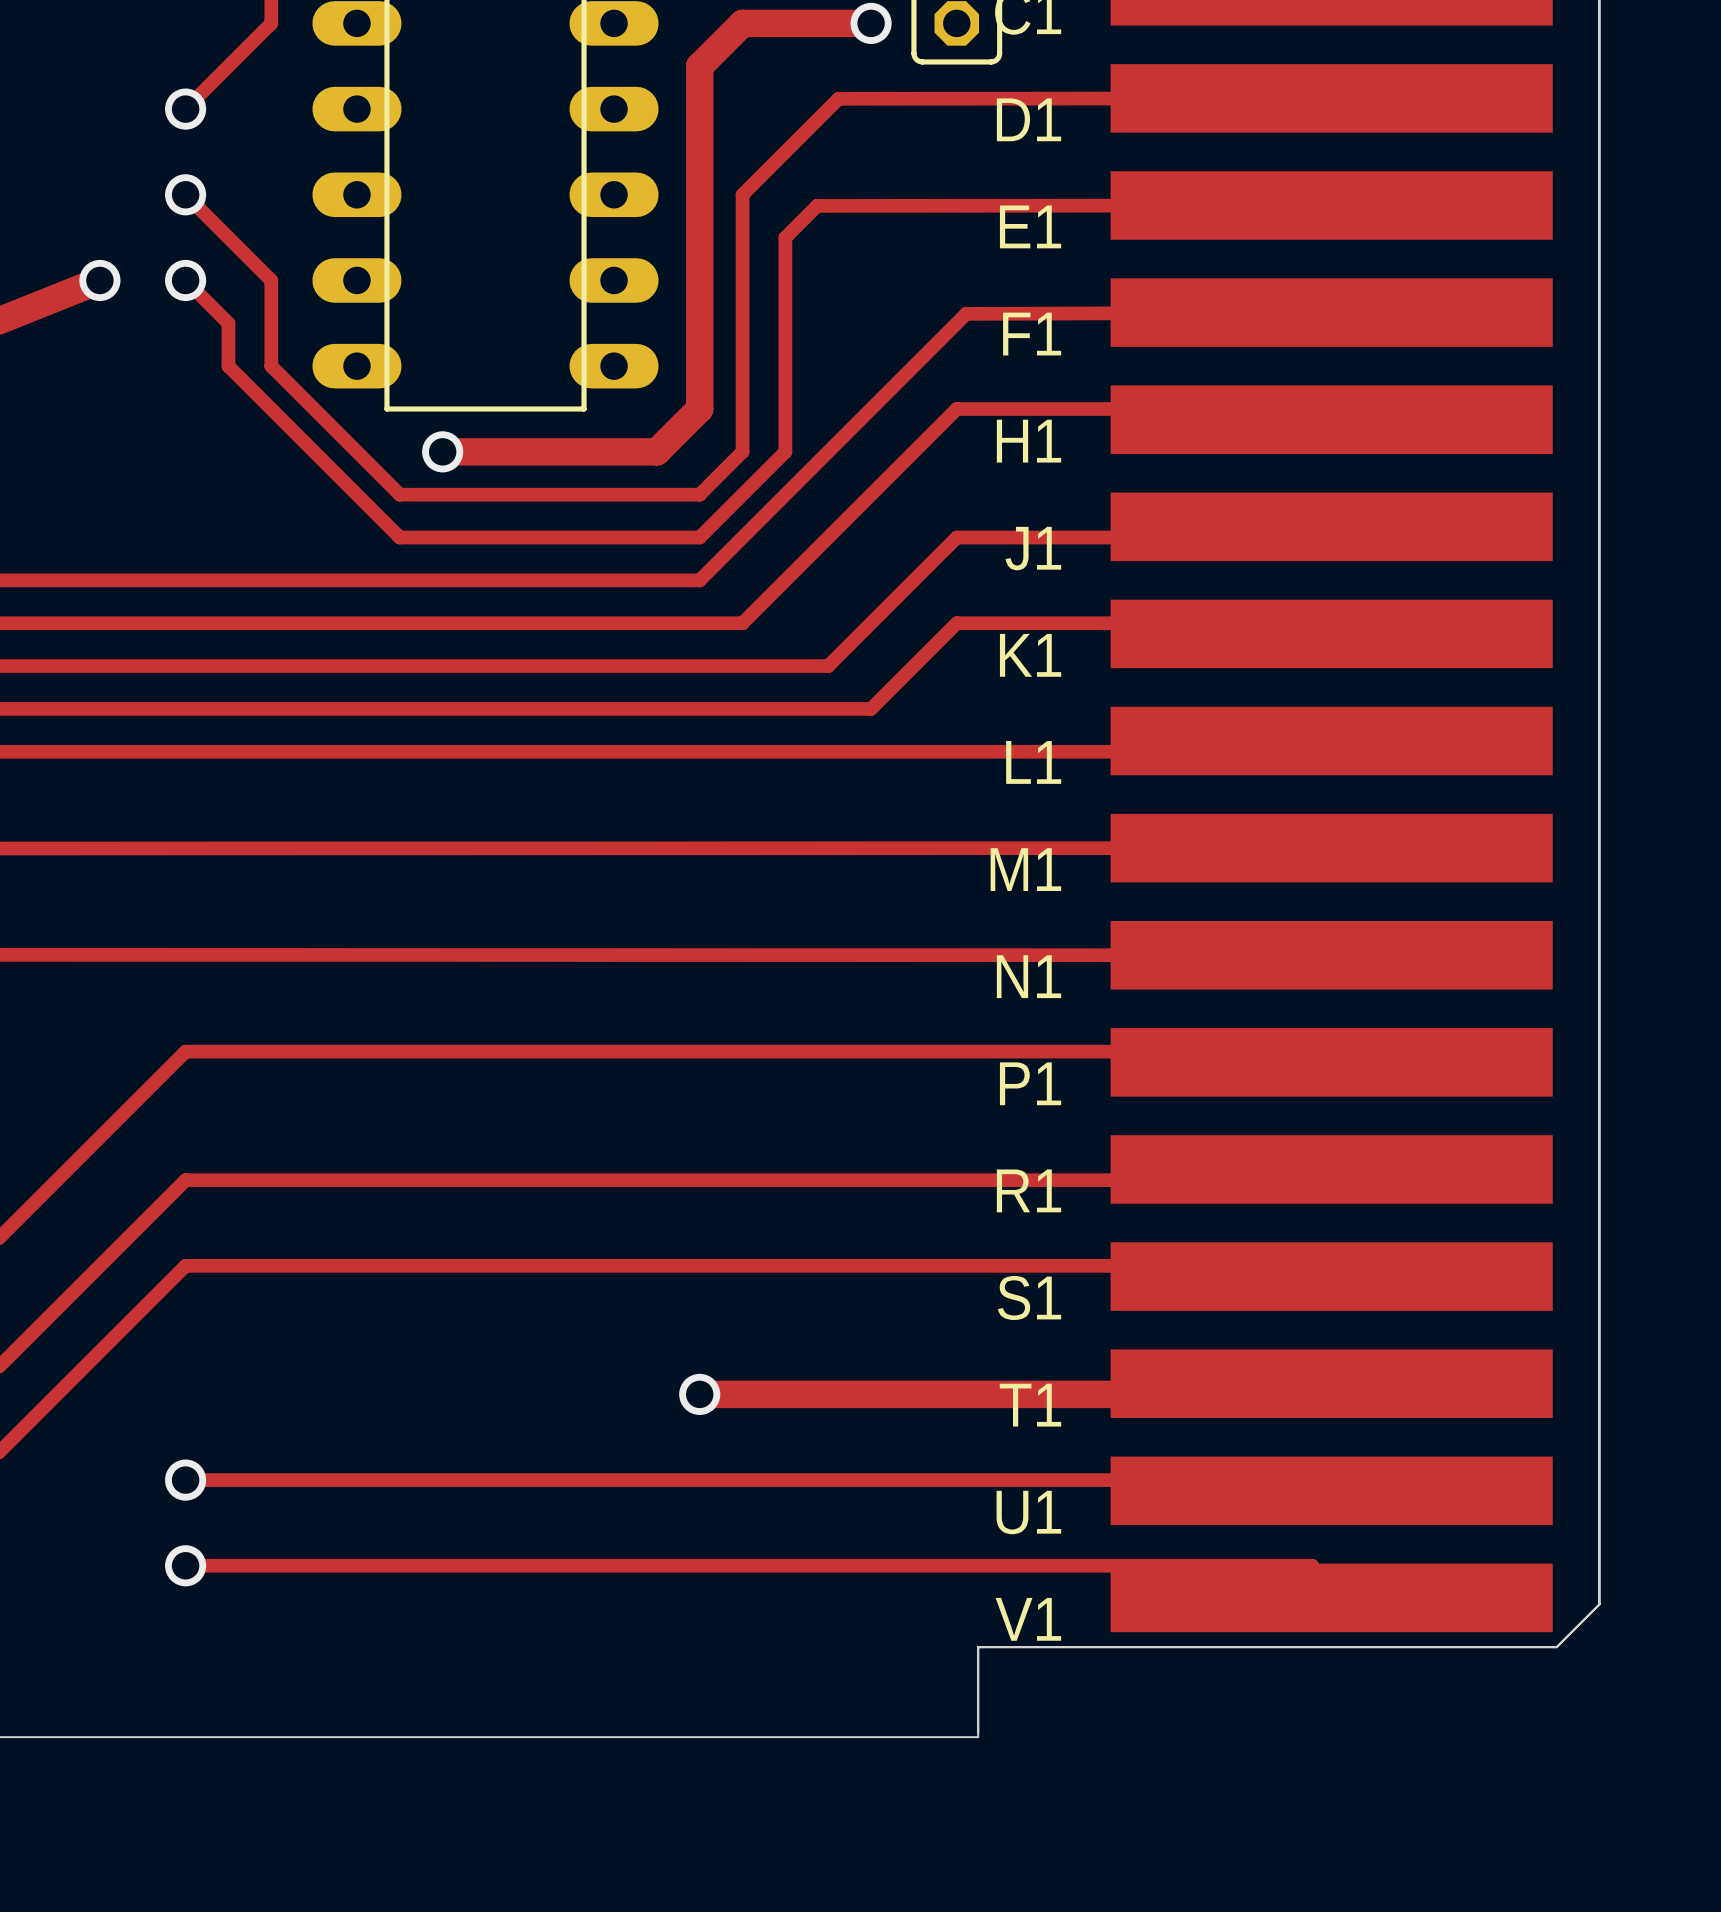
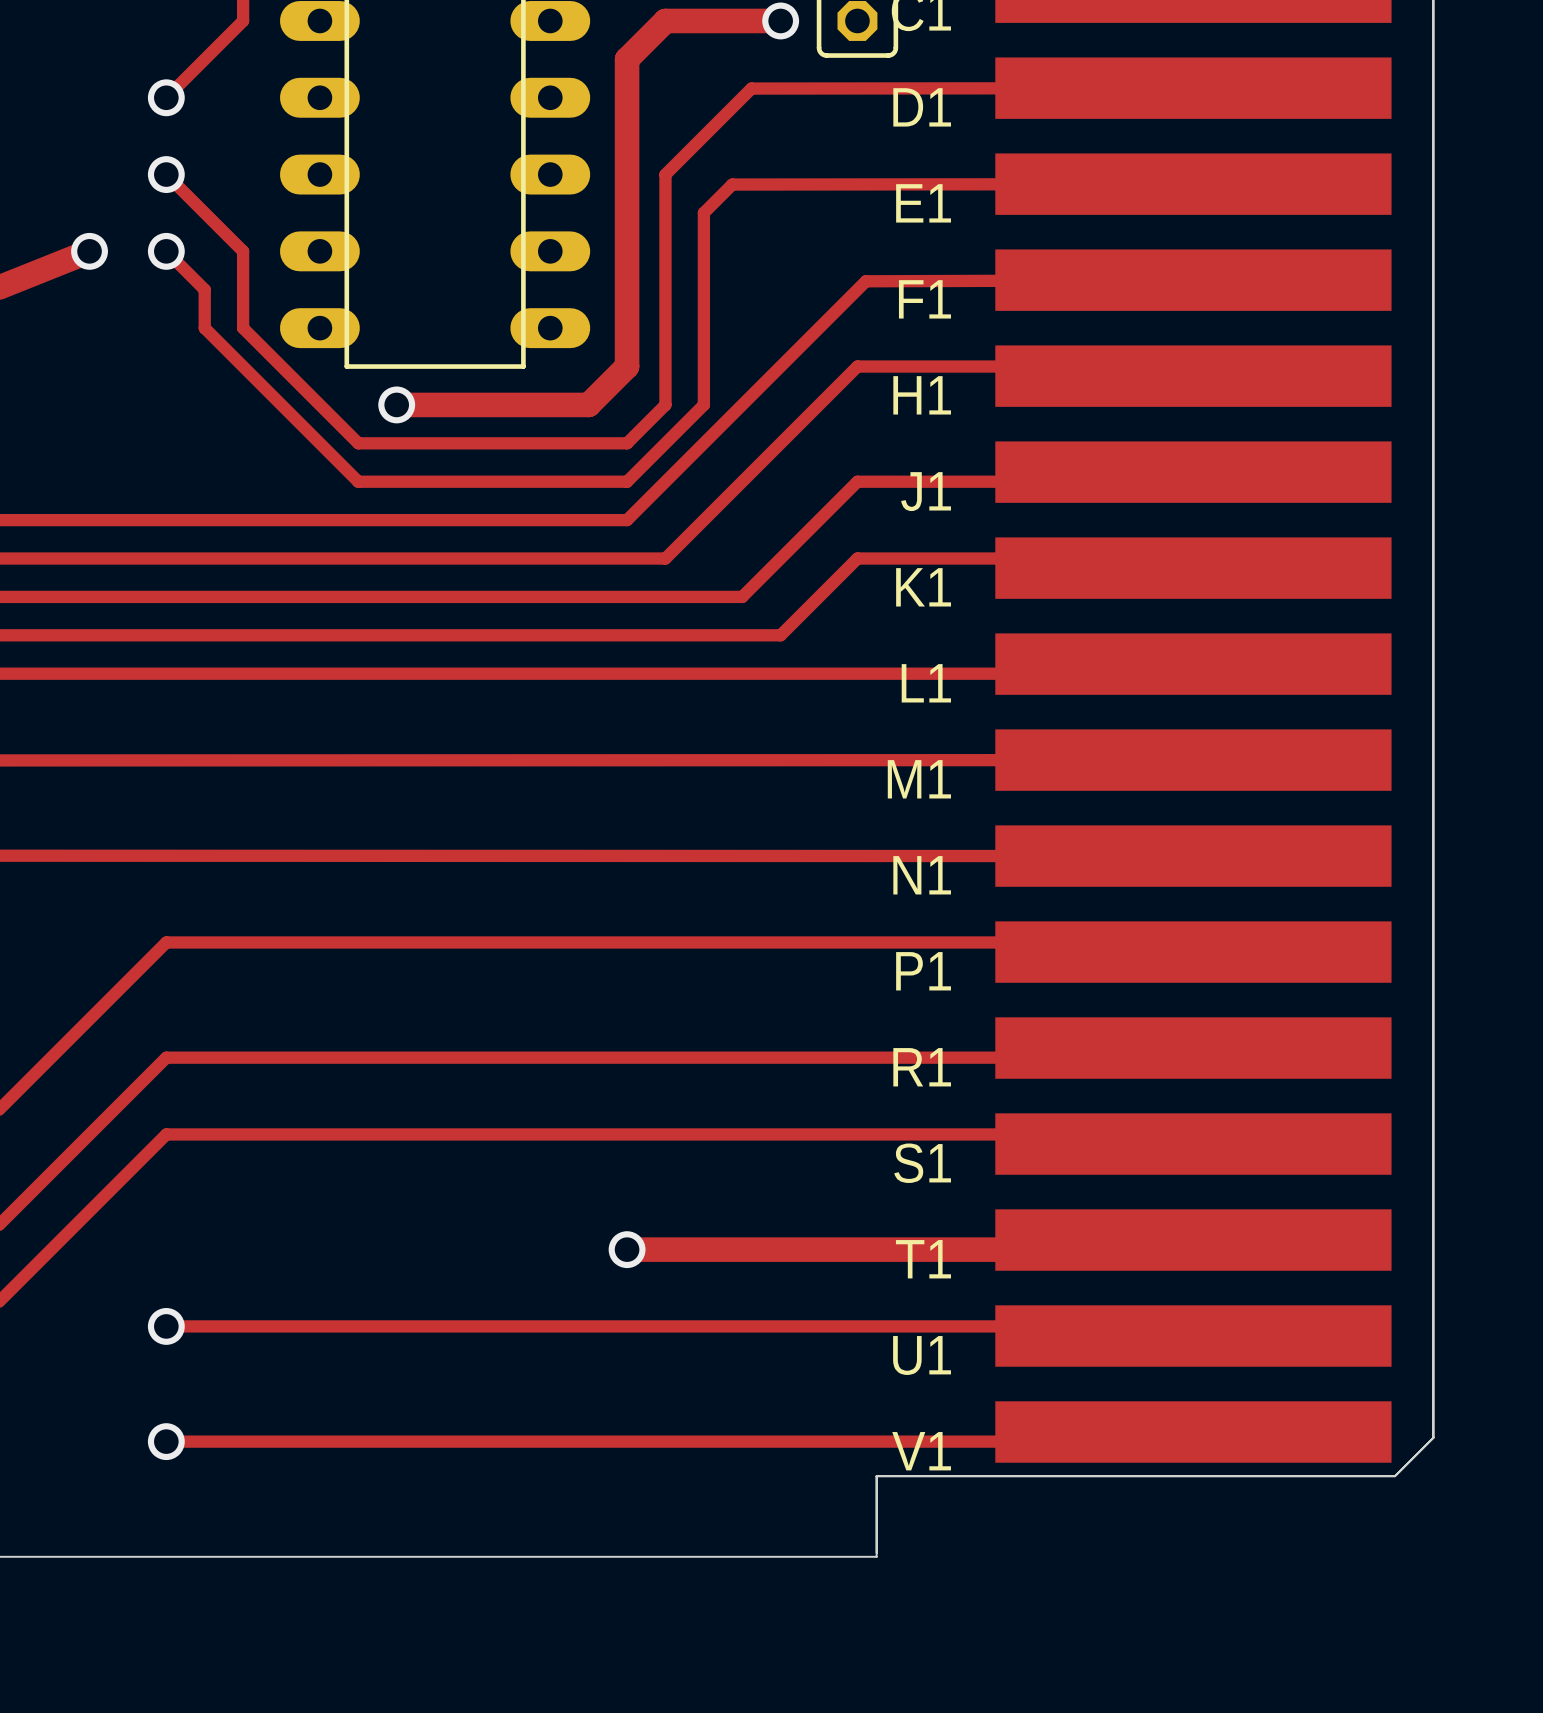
track: (185, 1565) (1312, 1565) (1331, 1597) -> (166, 1441) (1175, 1441) (1193, 1432)
via position: (185, 1565) -> (166, 1441)

